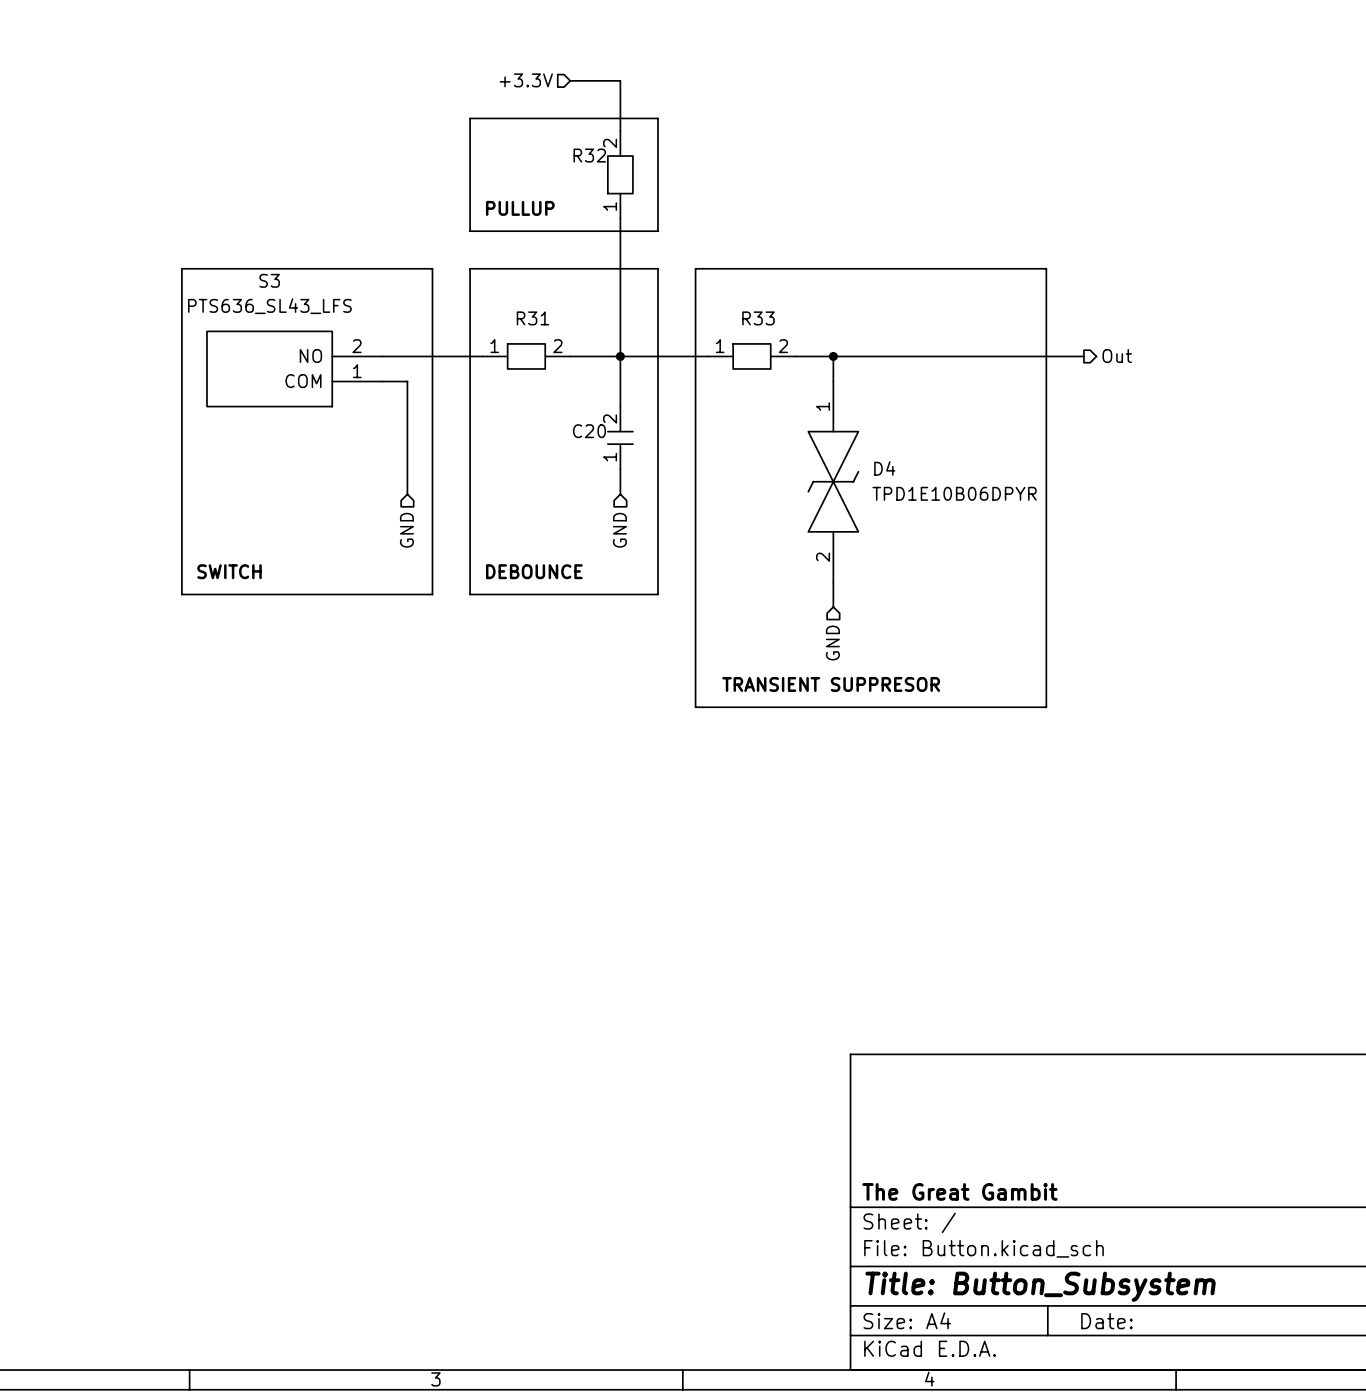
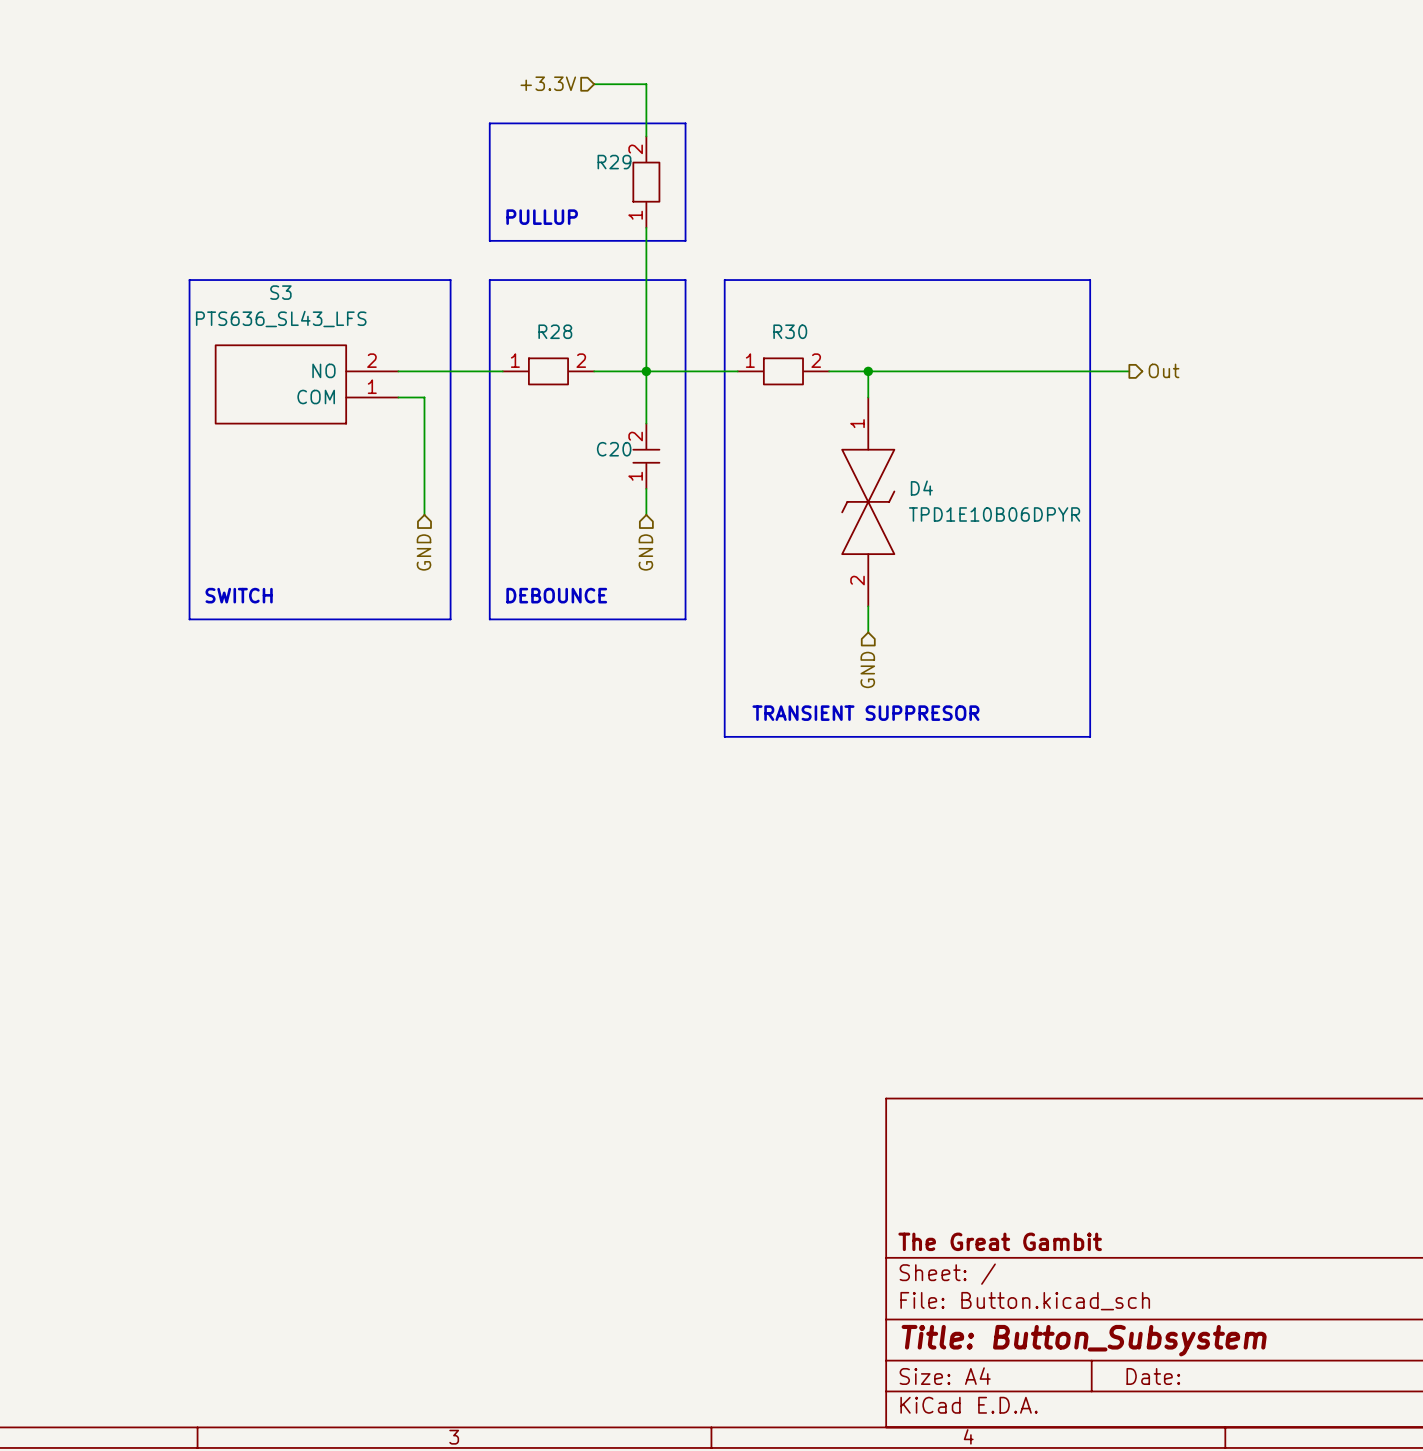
R32 name: R32 (589, 155) -> R29 (614, 162)
R31 name: R31 (533, 318) -> R28 (555, 331)
R33 name: R33 (758, 318) -> R30 (790, 331)

